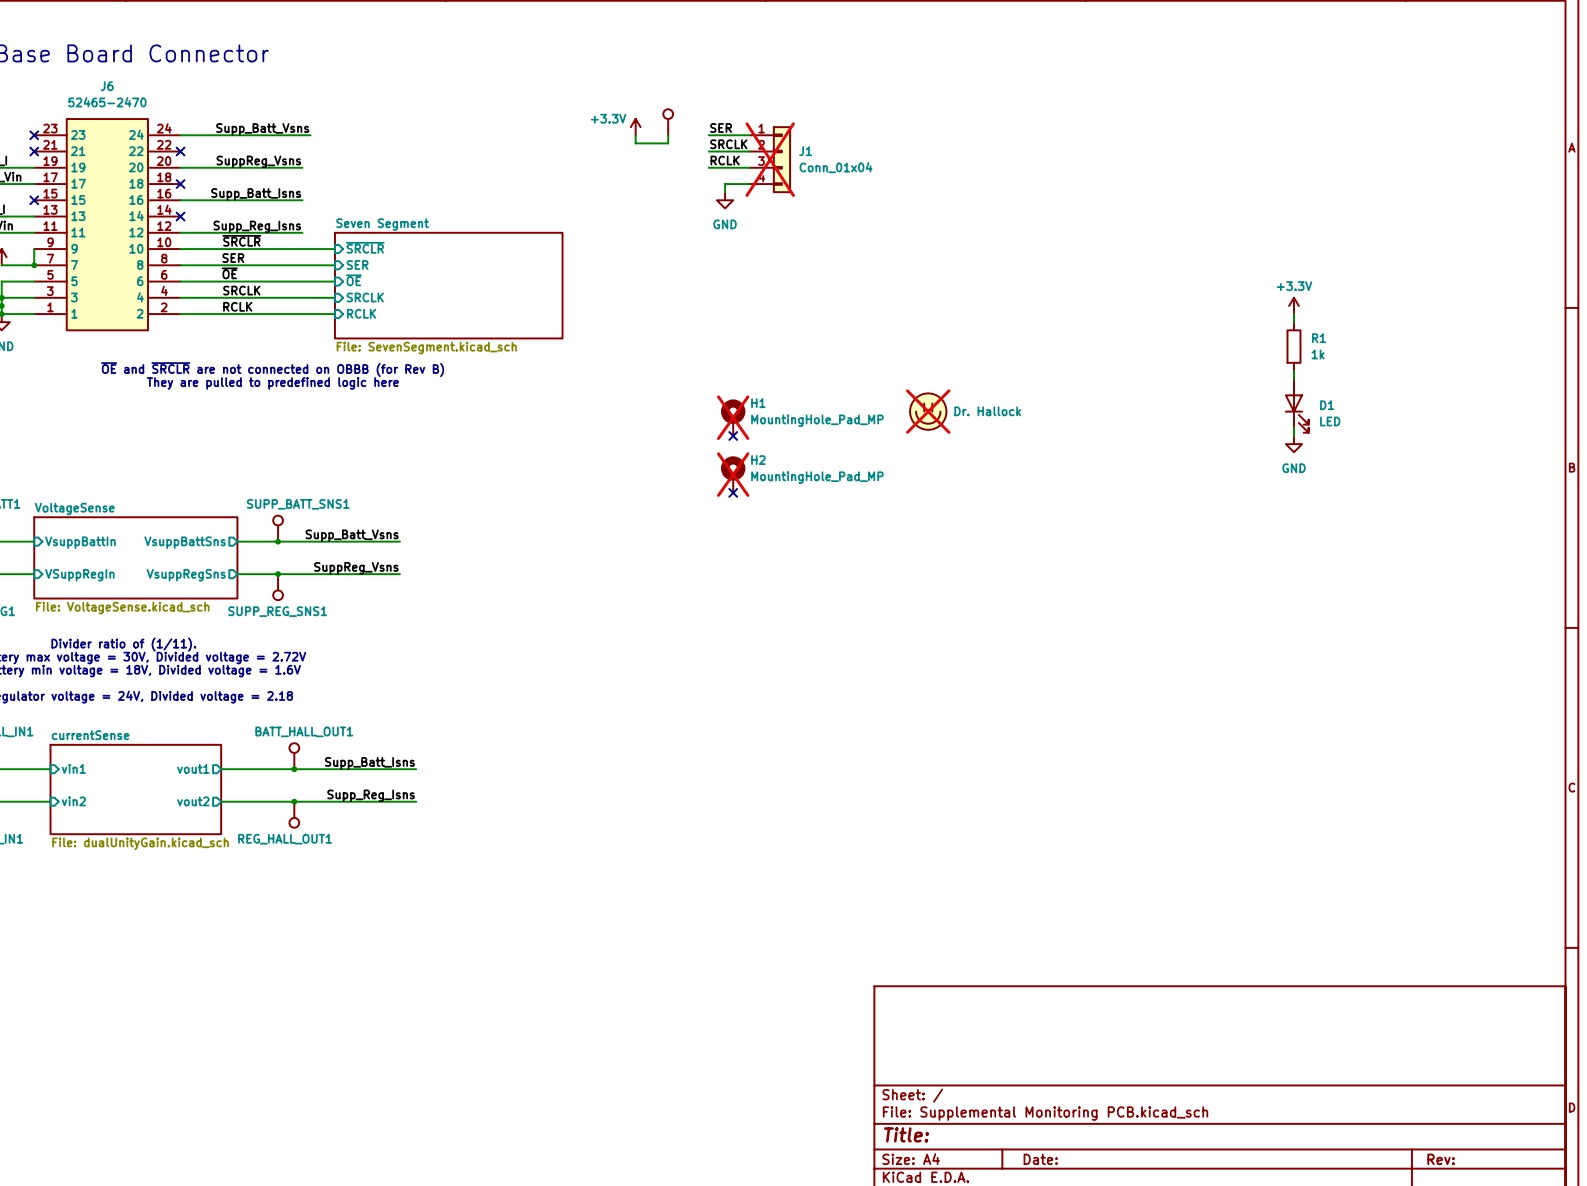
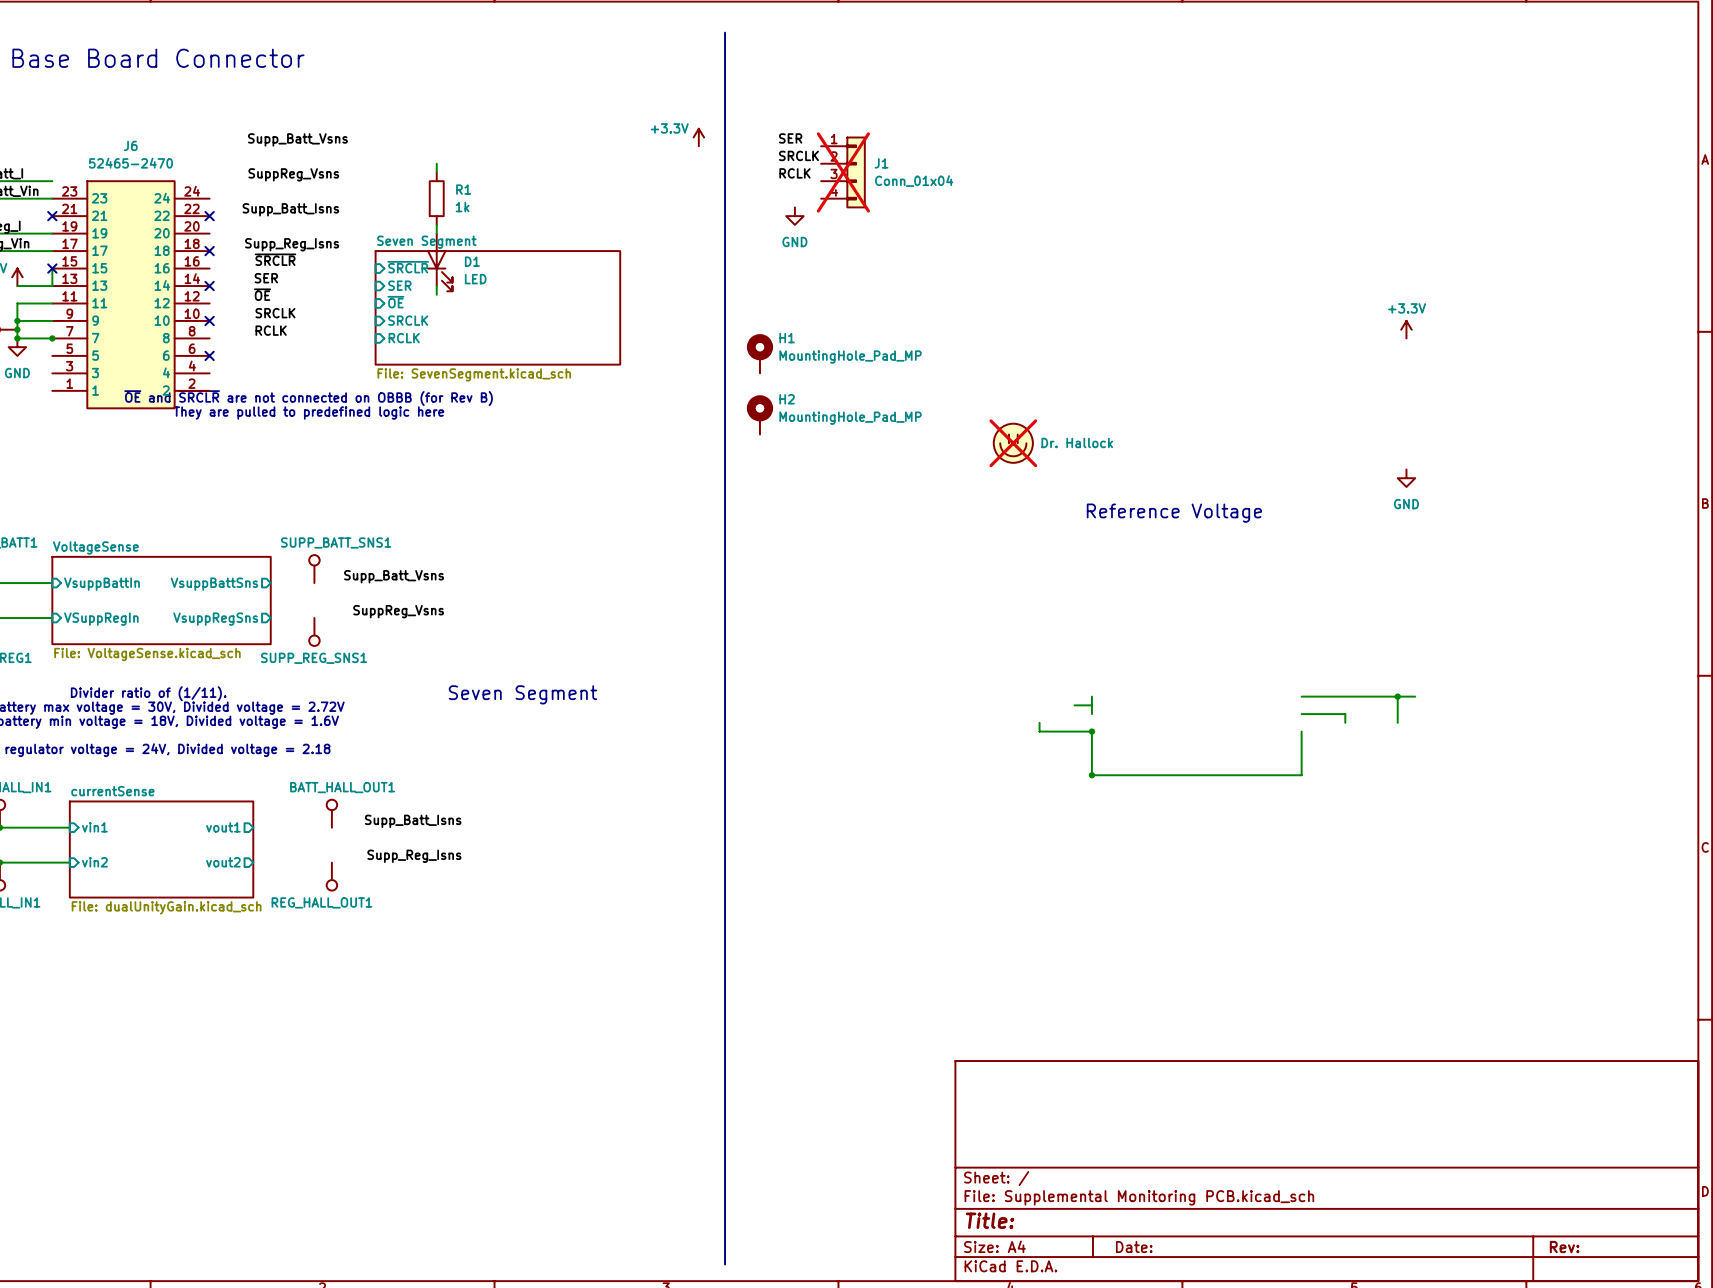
bus: none -> (725, 32) (725, 1264)
part: (668, 122) -> none
no-connect mark: (34, 135) -> none
wire: (180, 135) (310, 135) -> none
wire: (635, 135) (635, 143) (668, 143) (668, 135) -> none
wire: (708, 135) (749, 135) -> none
no-connect mark: (34, 151) -> none
no-connect mark: (180, 151) -> none
wire: none -> (436, 163) (436, 172)
wire: (708, 151) (749, 151) -> none
wire: (180, 167) (302, 167) -> none
wire: (708, 167) (749, 167) -> none
no-connect mark: (180, 184) -> none
wire: (749, 184) (725, 184) (725, 192) -> none
wire: (180, 200) (302, 200) -> none
no-connect mark: none -> (209, 216)
wire: none -> (436, 224) (436, 233)
no-connect mark: (180, 216) -> none
J6 position: (107, 224) -> (130, 294)
wire: (180, 232) (302, 232) -> none
no-connect mark: none -> (209, 251)
no-connect mark: none -> (52, 268)
wire: (180, 249) (334, 249) -> none
junction: (34, 265) -> none
wire: (180, 265) (334, 265) -> none
no-connect mark: none -> (209, 286)
wire: none -> (436, 286) (436, 294)
wire: (180, 281) (334, 281) -> none
wire: (180, 297) (334, 297) -> none
no-connect mark: none -> (209, 320)
junction: none -> (52, 338)
wire: (180, 314) (334, 314) -> none
wire: (1293, 314) (1293, 322) -> none
no-connect mark: none -> (209, 355)
R1 position: (1293, 346) -> (436, 198)
wire: (1293, 370) (1293, 379) -> none
D1 position: (1296, 405) -> (439, 262)
H1 position: (733, 417) -> (759, 353)
H1 do-not-place cross: (733, 417) -> none
wire: (1293, 427) (1293, 435) -> none
no-connect mark: (733, 435) -> none
H2 position: (733, 474) -> (759, 414)
H2 do-not-place cross: (733, 474) -> none
text: none -> Reference Voltage (1174, 513)
no-connect mark: (733, 492) -> none
wire: (237, 541) (399, 541) -> none
junction: (278, 541) -> none
wire: (237, 574) (399, 574) -> none
junction: (278, 574) -> none
text: none -> Seven Segment (522, 694)
wire: none -> (1091, 696) (1091, 714)
wire: none -> (1301, 696) (1415, 696)
wire: none -> (1397, 696) (1397, 722)
junction: none -> (1397, 696)
wire: none -> (1074, 705) (1091, 705)
wire: none -> (1301, 714) (1345, 714) (1345, 722)
wire: none -> (1039, 722) (1039, 731) (1091, 731) (1091, 775) (1301, 775) (1301, 731)
junction: none -> (1091, 731)
junction: none -> (1091, 775)
wire: (221, 769) (416, 769) -> none
junction: (294, 769) -> none
wire: (221, 801) (416, 801) -> none
junction: (294, 801) -> none

